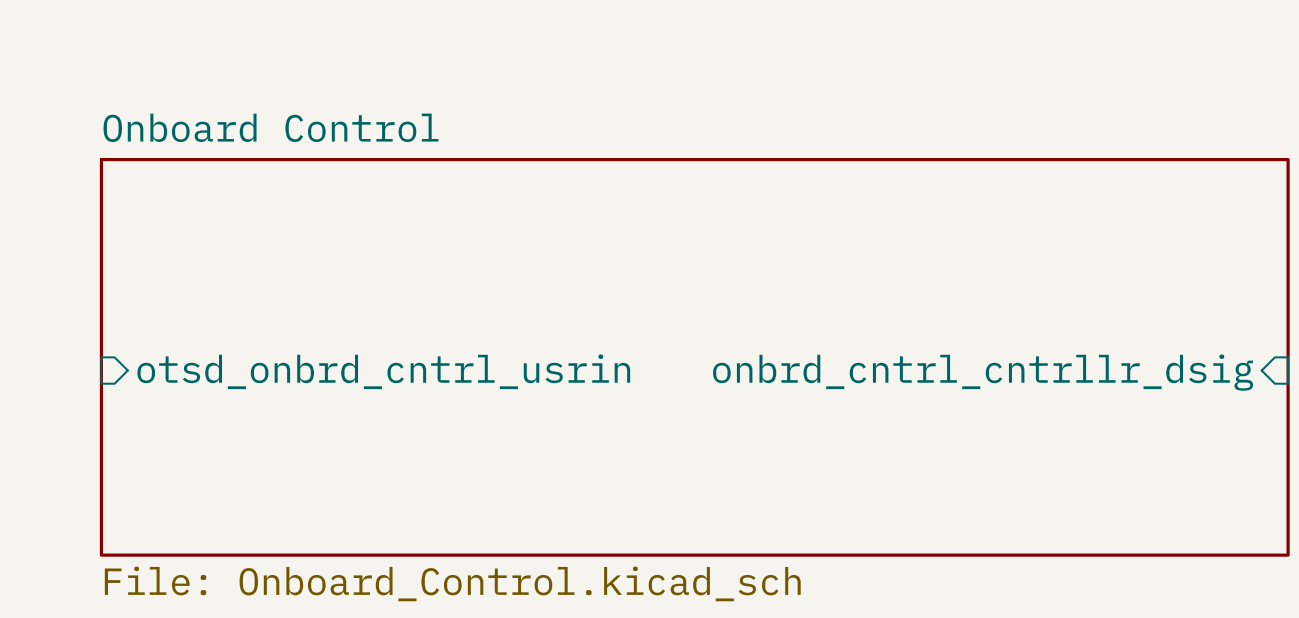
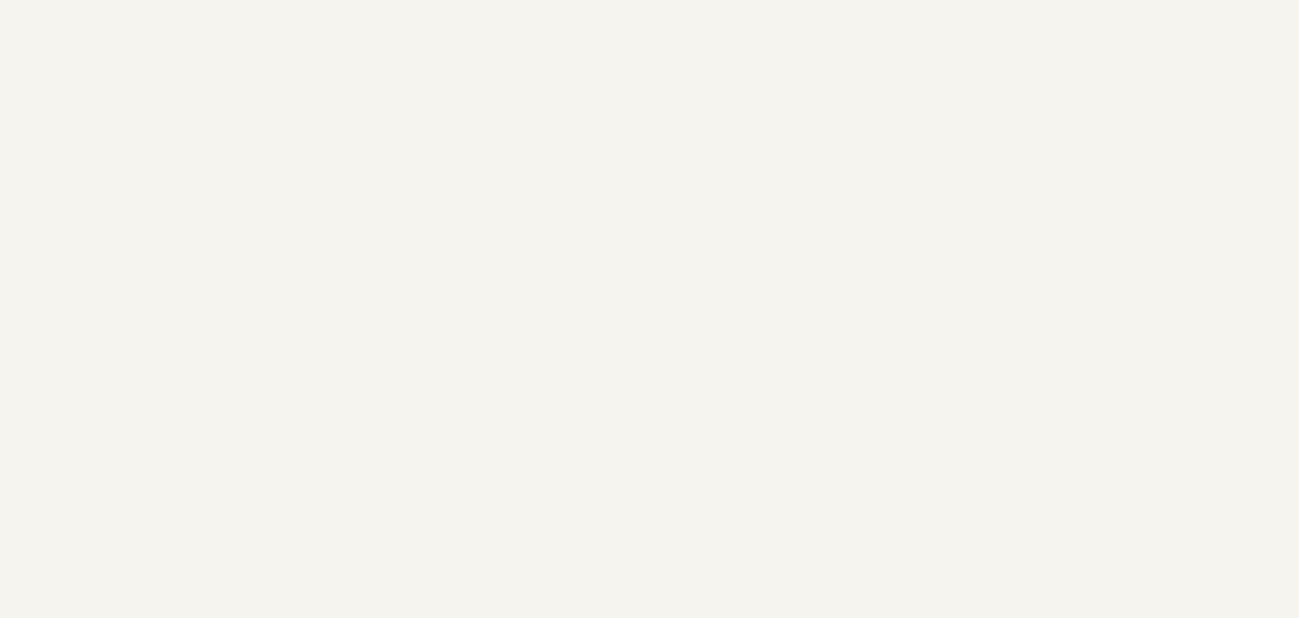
sheet Onboard Control: File: Onboard_Control.kicad_sch (694, 357) -> none
sheet pin: otsd_onbrd_cntrl_usrin (383, 371) -> none
sheet pin: onbrd_cntrl_cntrllr_dsig (983, 372) -> none

